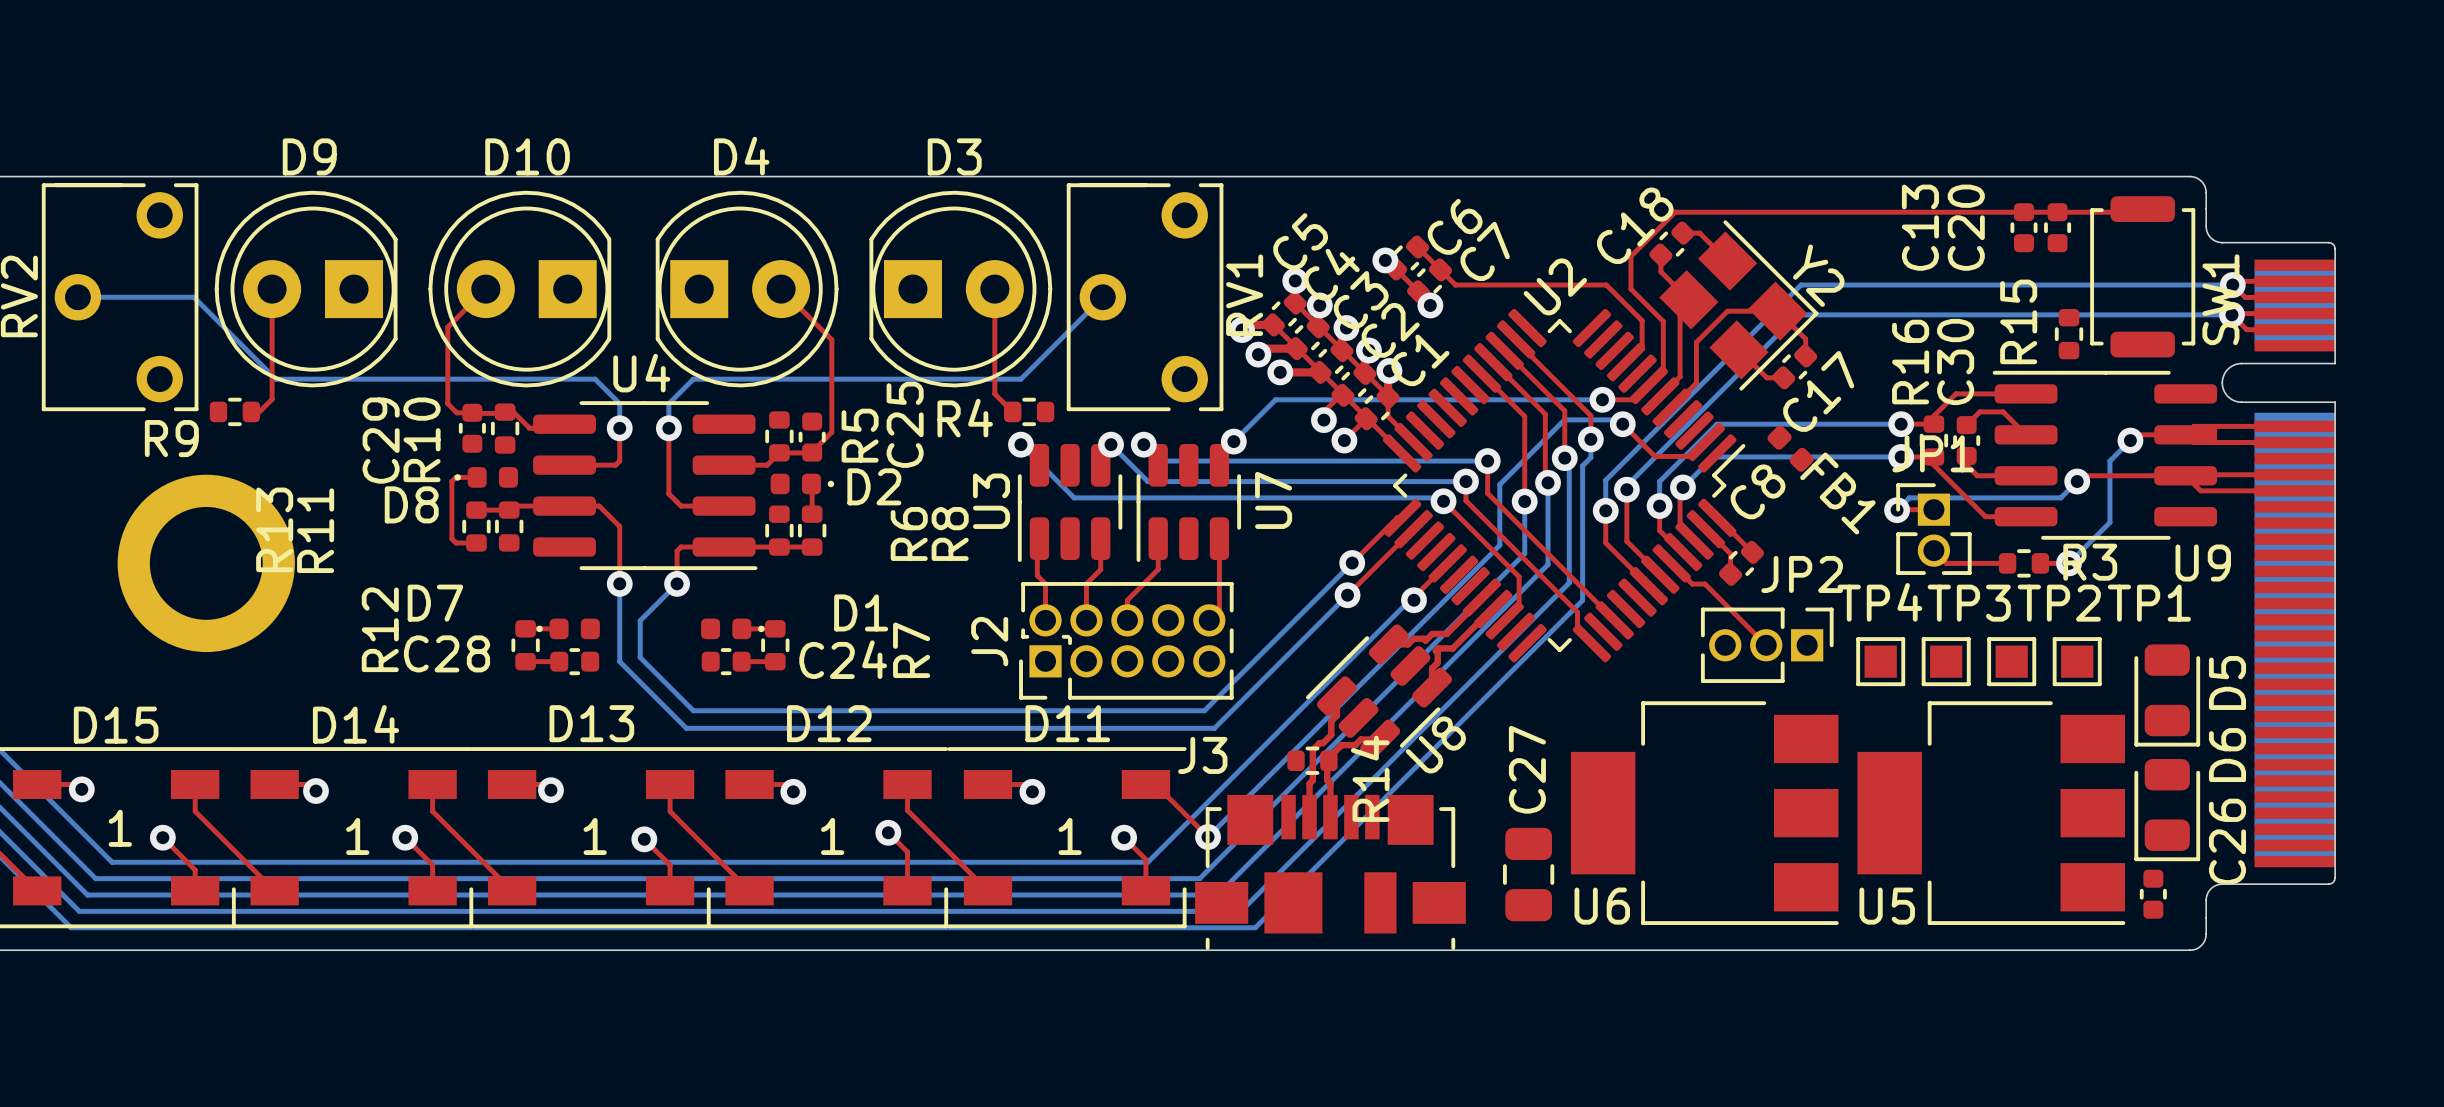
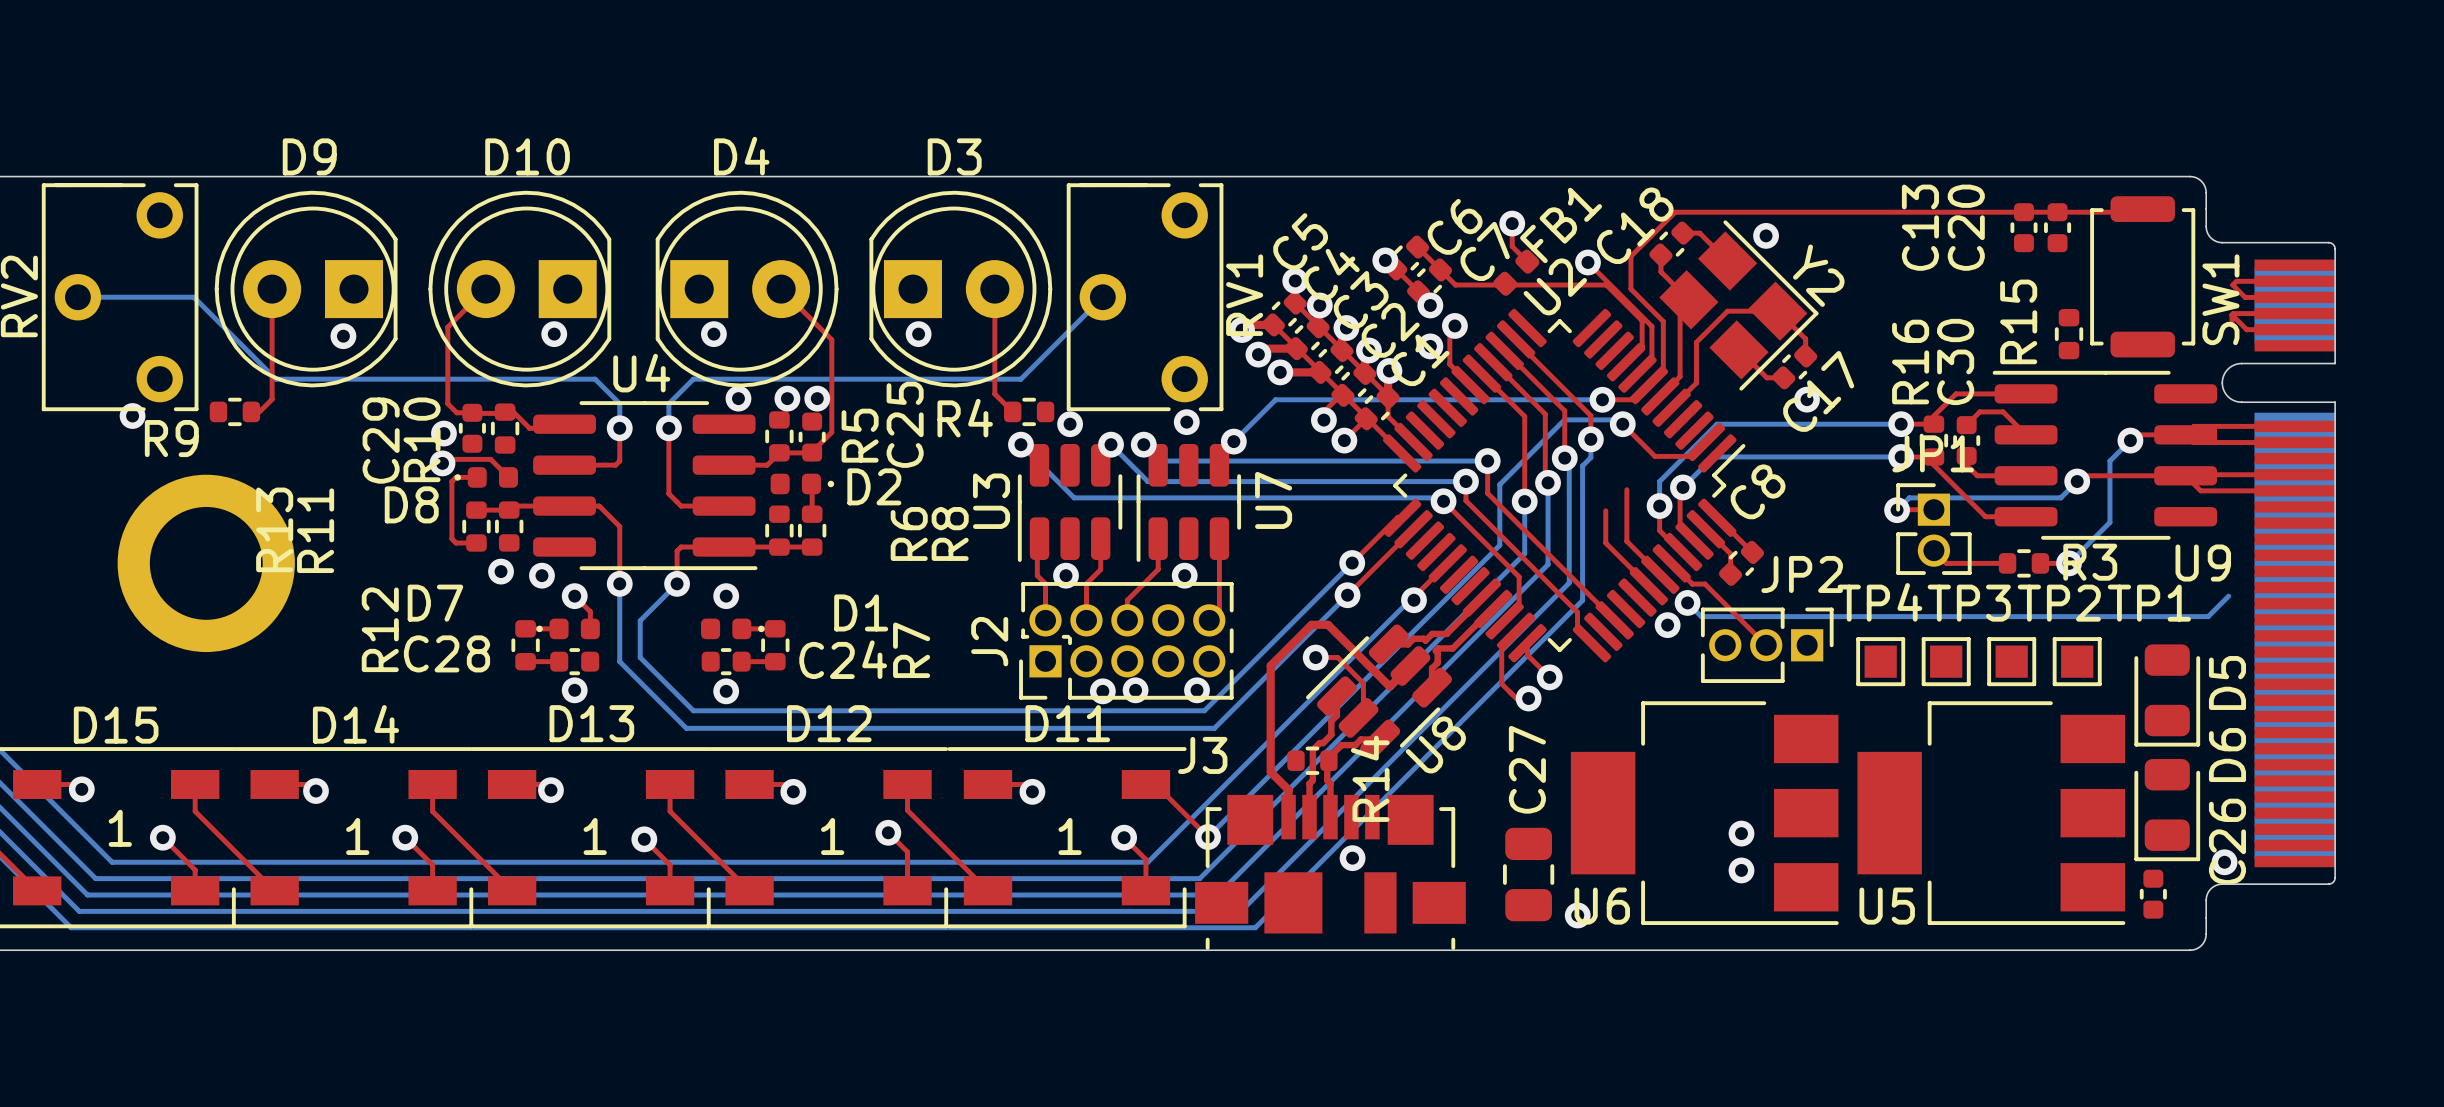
top track: none -> (1512, 223) (1512, 246) (1527, 261)
via: none -> (1512, 223)
via: none -> (1766, 235)
top track: none -> (1587, 262) (1651, 326) (1651, 359) (1637, 373)
via: none -> (1587, 262)
bottom track: (2232, 285) (1800, 285) (1605, 480) (1605, 510) -> none
via: (2232, 285) -> none
bottom track: (2231, 314) (1797, 314) (1626, 485) (1626, 489) -> none
via: (2231, 314) -> none
top track: none -> (1459, 321) (1449, 331) (1449, 364) (1470, 385)
via: none -> (1454, 325)
via: none -> (554, 334)
via: none -> (713, 334)
via: none -> (918, 334)
via: none -> (343, 336)
via: none -> (1430, 346)
via: none -> (738, 398)
via: none -> (787, 398)
via: none -> (817, 398)
via: none -> (1807, 399)
via: none -> (132, 416)
via: none -> (1186, 422)
via: none -> (1070, 424)
via: none -> (443, 433)
FB1 rotation: 0° (1790, 448) -> 90° clockwise (1516, 272)
FB1 position: (1790, 448) -> (1516, 272)
top track: none -> (442, 463) (446, 459) (490, 459) (508, 477)
via: none -> (442, 463)
via: (1626, 489) -> none
FB1 name position: FB1 (1837, 493) -> FB1 (1561, 225)
via: (1605, 510) -> none
via: none -> (501, 571)
via: none -> (541, 575)
via: none -> (1065, 575)
via: none -> (1184, 575)
top track: none -> (574, 596) (590, 611) (590, 628)
via: none -> (574, 596)
via: none -> (726, 596)
bottom track: none -> (2228, 596) (2208, 616) (1701, 616) (1687, 602)
via: none -> (1687, 602)
via: none -> (1667, 625)
top track: none -> (1516, 631) (1501, 646) (1501, 683) (1516, 698) (1528, 698)
top track: none -> (1527, 643) (1527, 655) (1549, 677)
top track: none -> (1315, 657) (1337, 657) (1363, 683) (1363, 713) (1358, 717)
via: none -> (1315, 657)
top track: none -> (1410, 666) (1389, 686) (1328, 624) (1311, 624) (1270, 665) (1270, 772) (1288, 789) (1288, 817)
via: none -> (1549, 677)
via: none -> (574, 690)
via: none -> (1135, 690)
via: none -> (1197, 690)
via: none -> (726, 691)
via: none -> (1102, 691)
via: none -> (1528, 698)
via: none -> (1741, 833)
via: none -> (1352, 858)
via: none -> (2224, 862)
via: none -> (1741, 870)
via: none -> (1577, 915)

